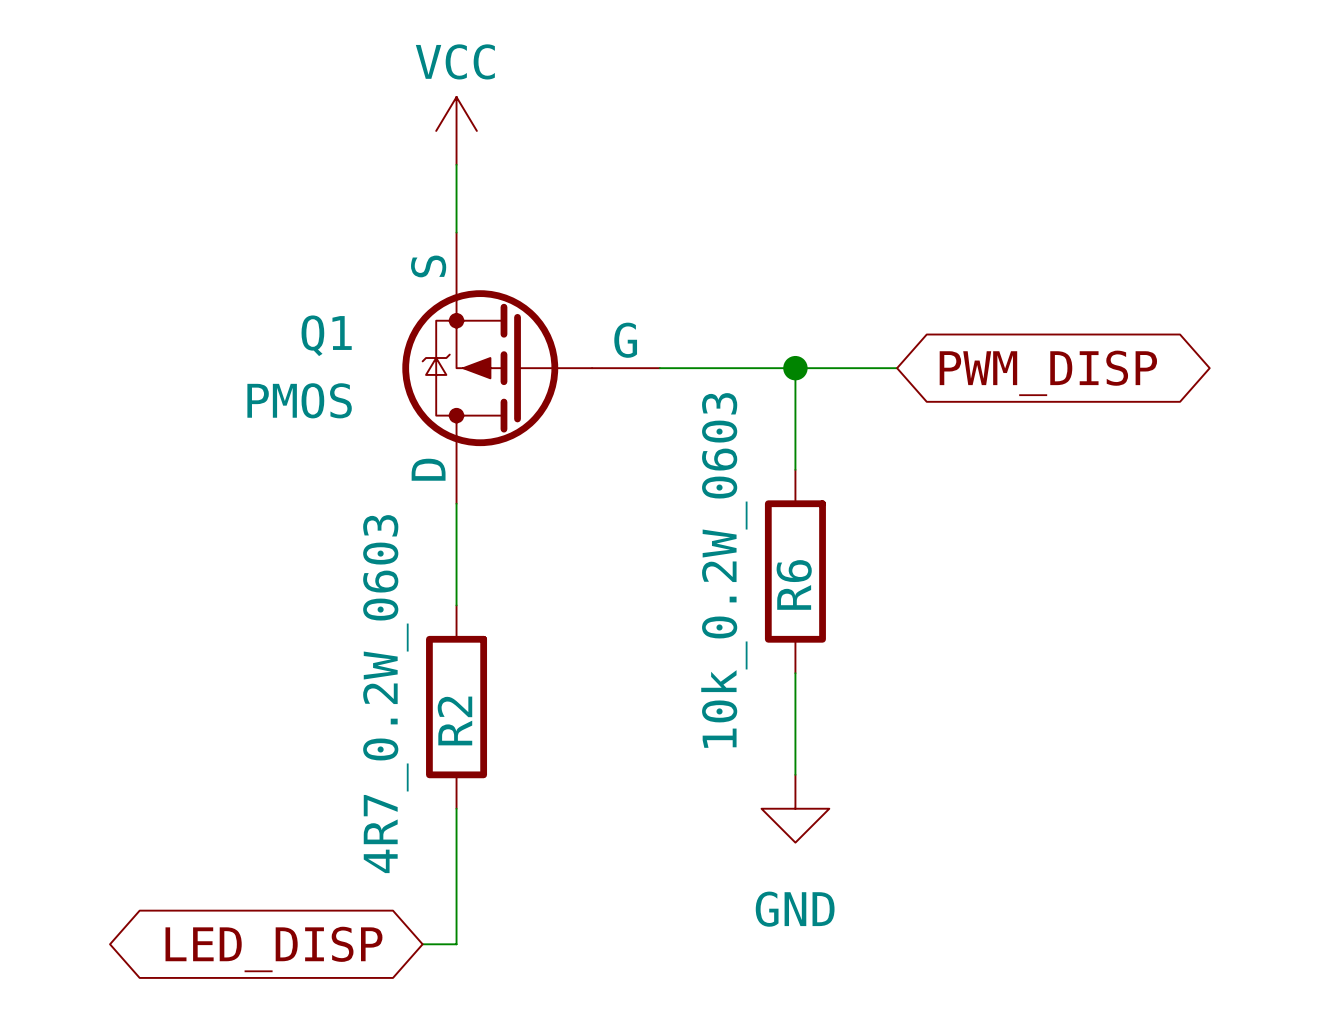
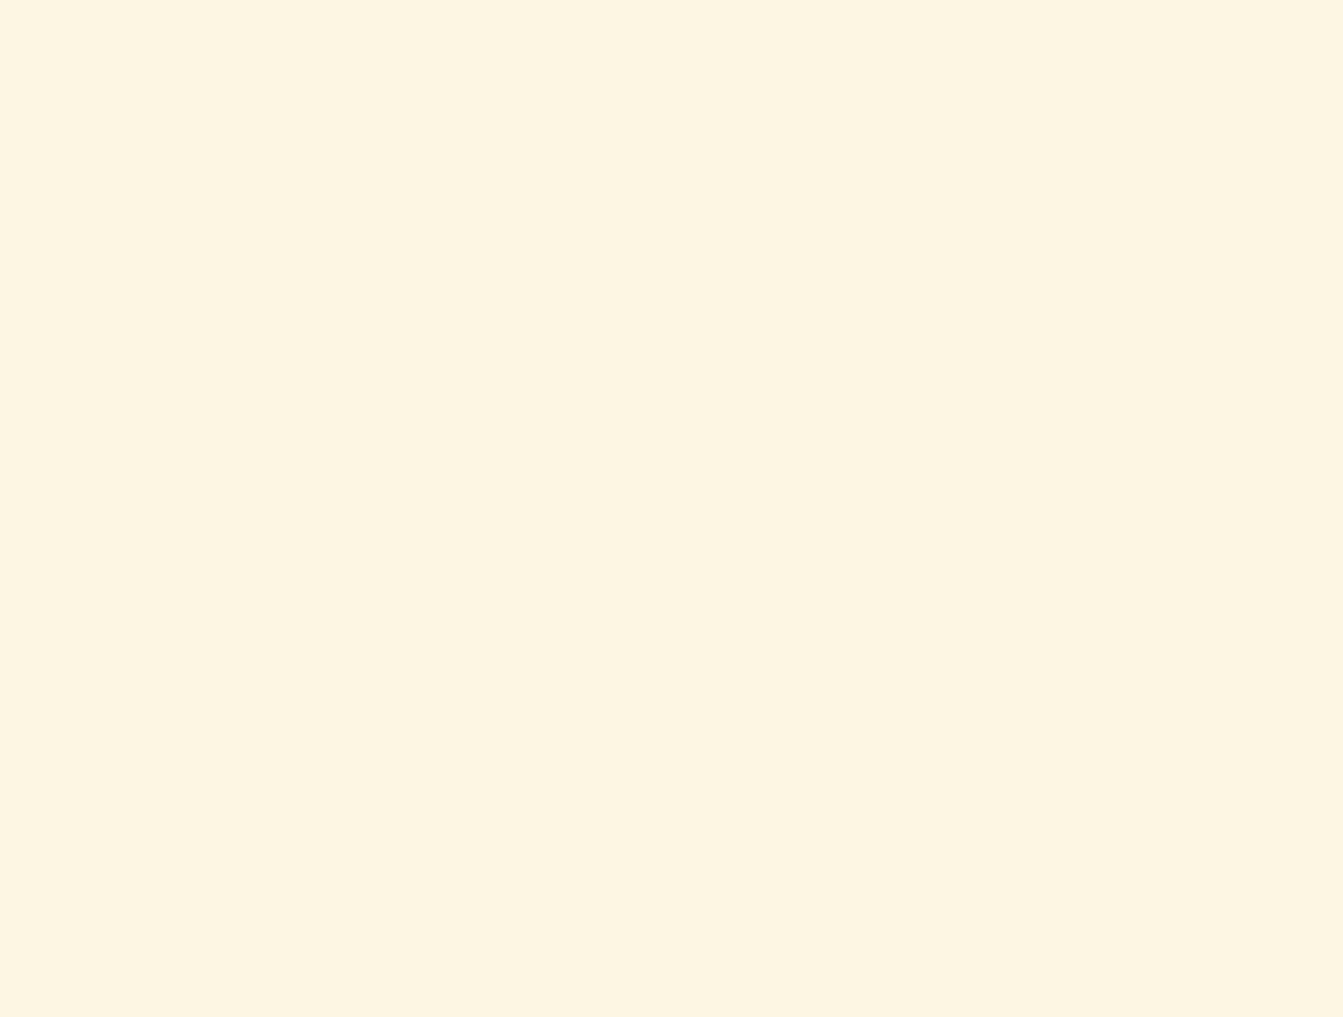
power symbol: VCC (456, 130) -> none
wire: (456, 164) (456, 232) -> none
Q1: PMOS (531, 368) -> none
wire: (659, 368) (897, 368) -> none
wire: (795, 368) (795, 469) -> none
junction: (795, 368) -> none
global label: PWM_DISP (1048, 373) -> none
wire: (456, 503) (456, 605) -> none
R6: 10k_0.2W_0603 (795, 571) -> none
wire: (795, 673) (795, 774) -> none
R2: 4R7_0.2W_0603 (456, 707) -> none
wire: (456, 808) (456, 944) (422, 944) -> none
power symbol: GND (795, 808) -> none
global label: LED_DISP (273, 949) -> none

